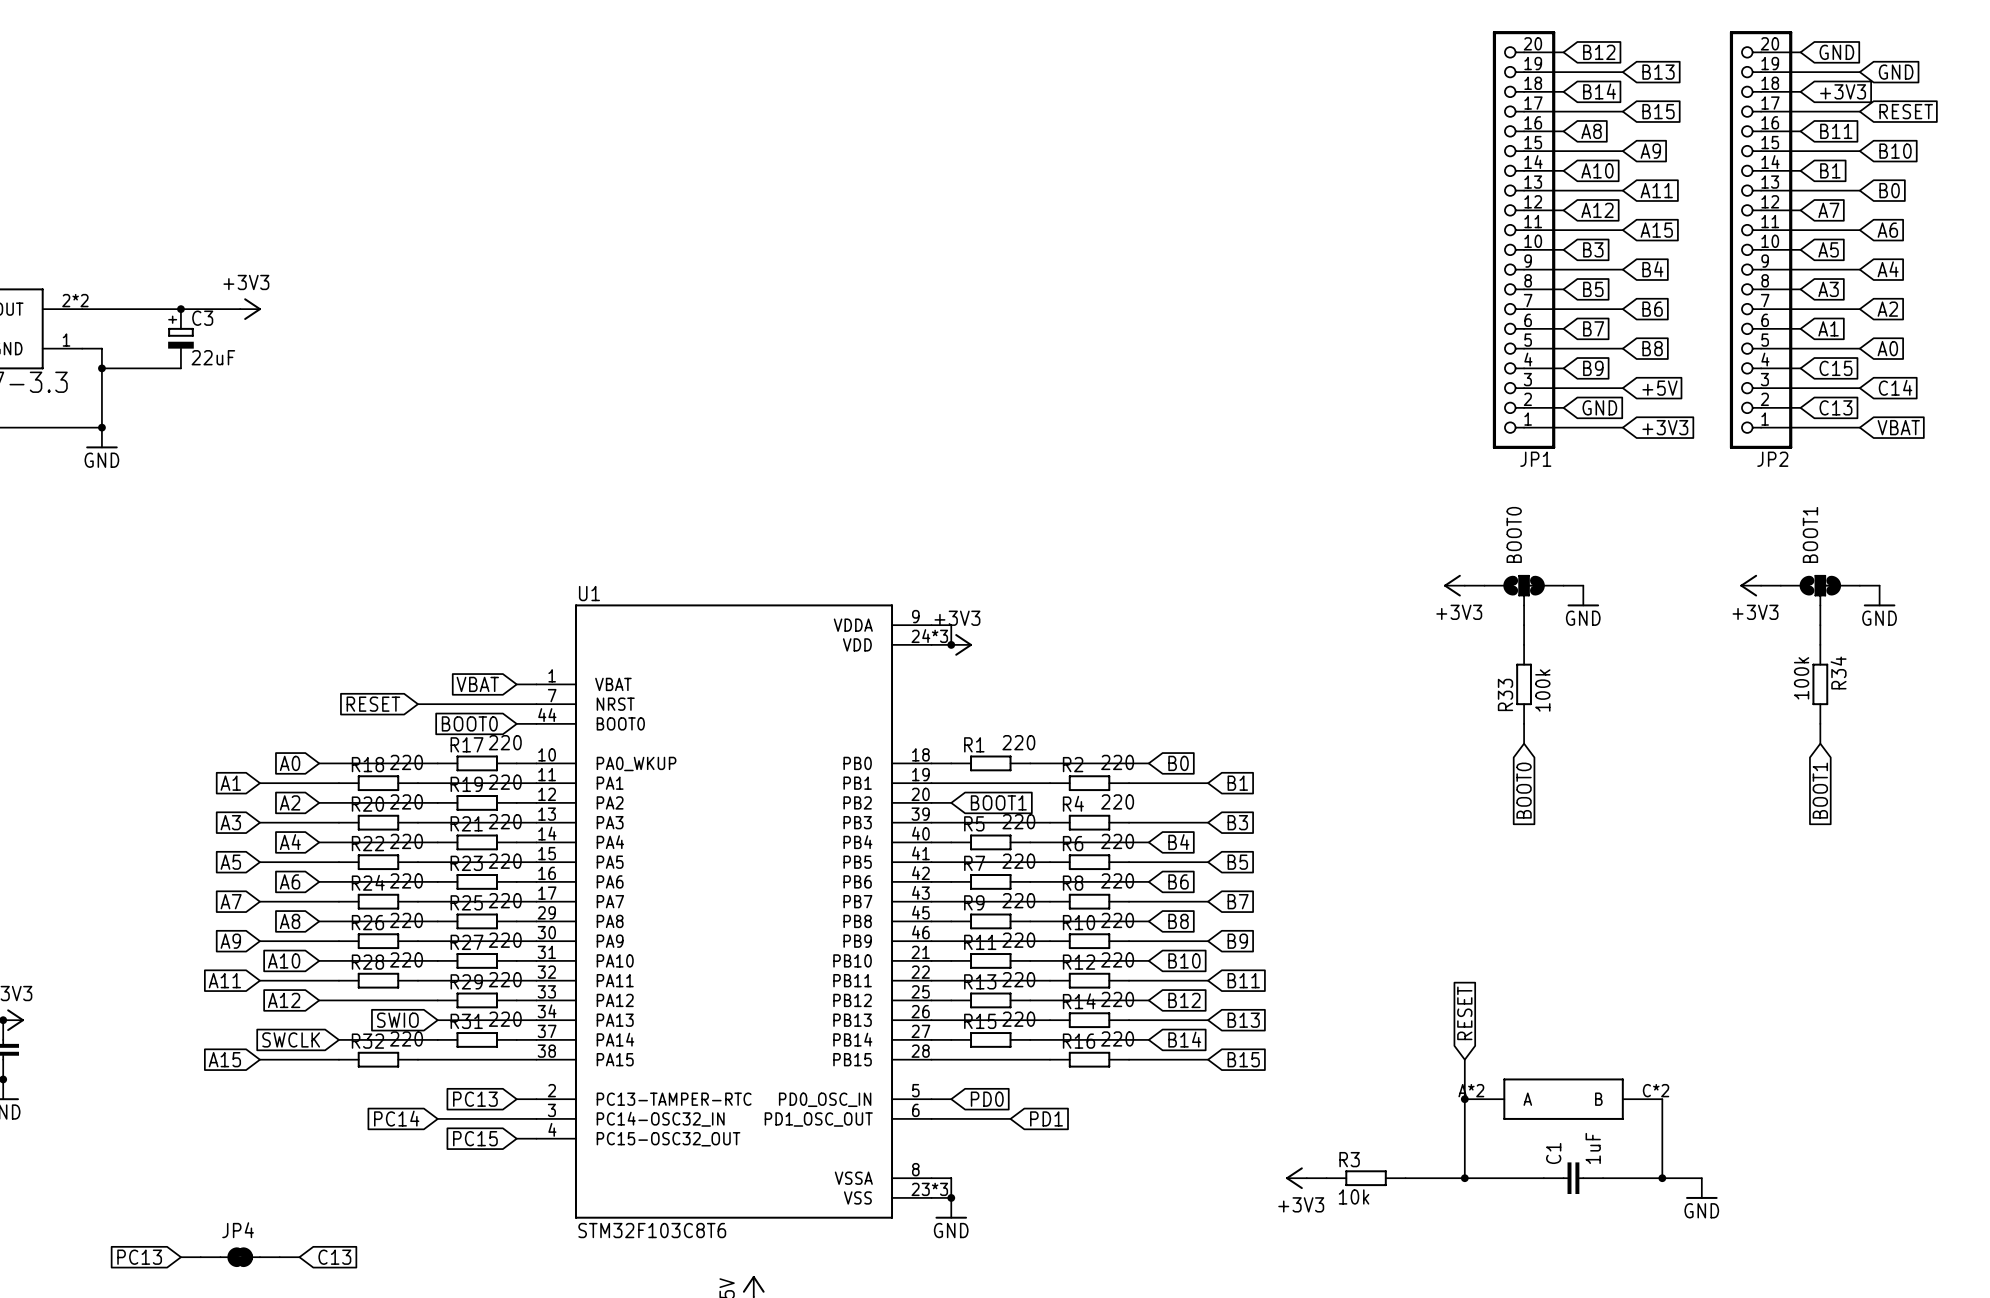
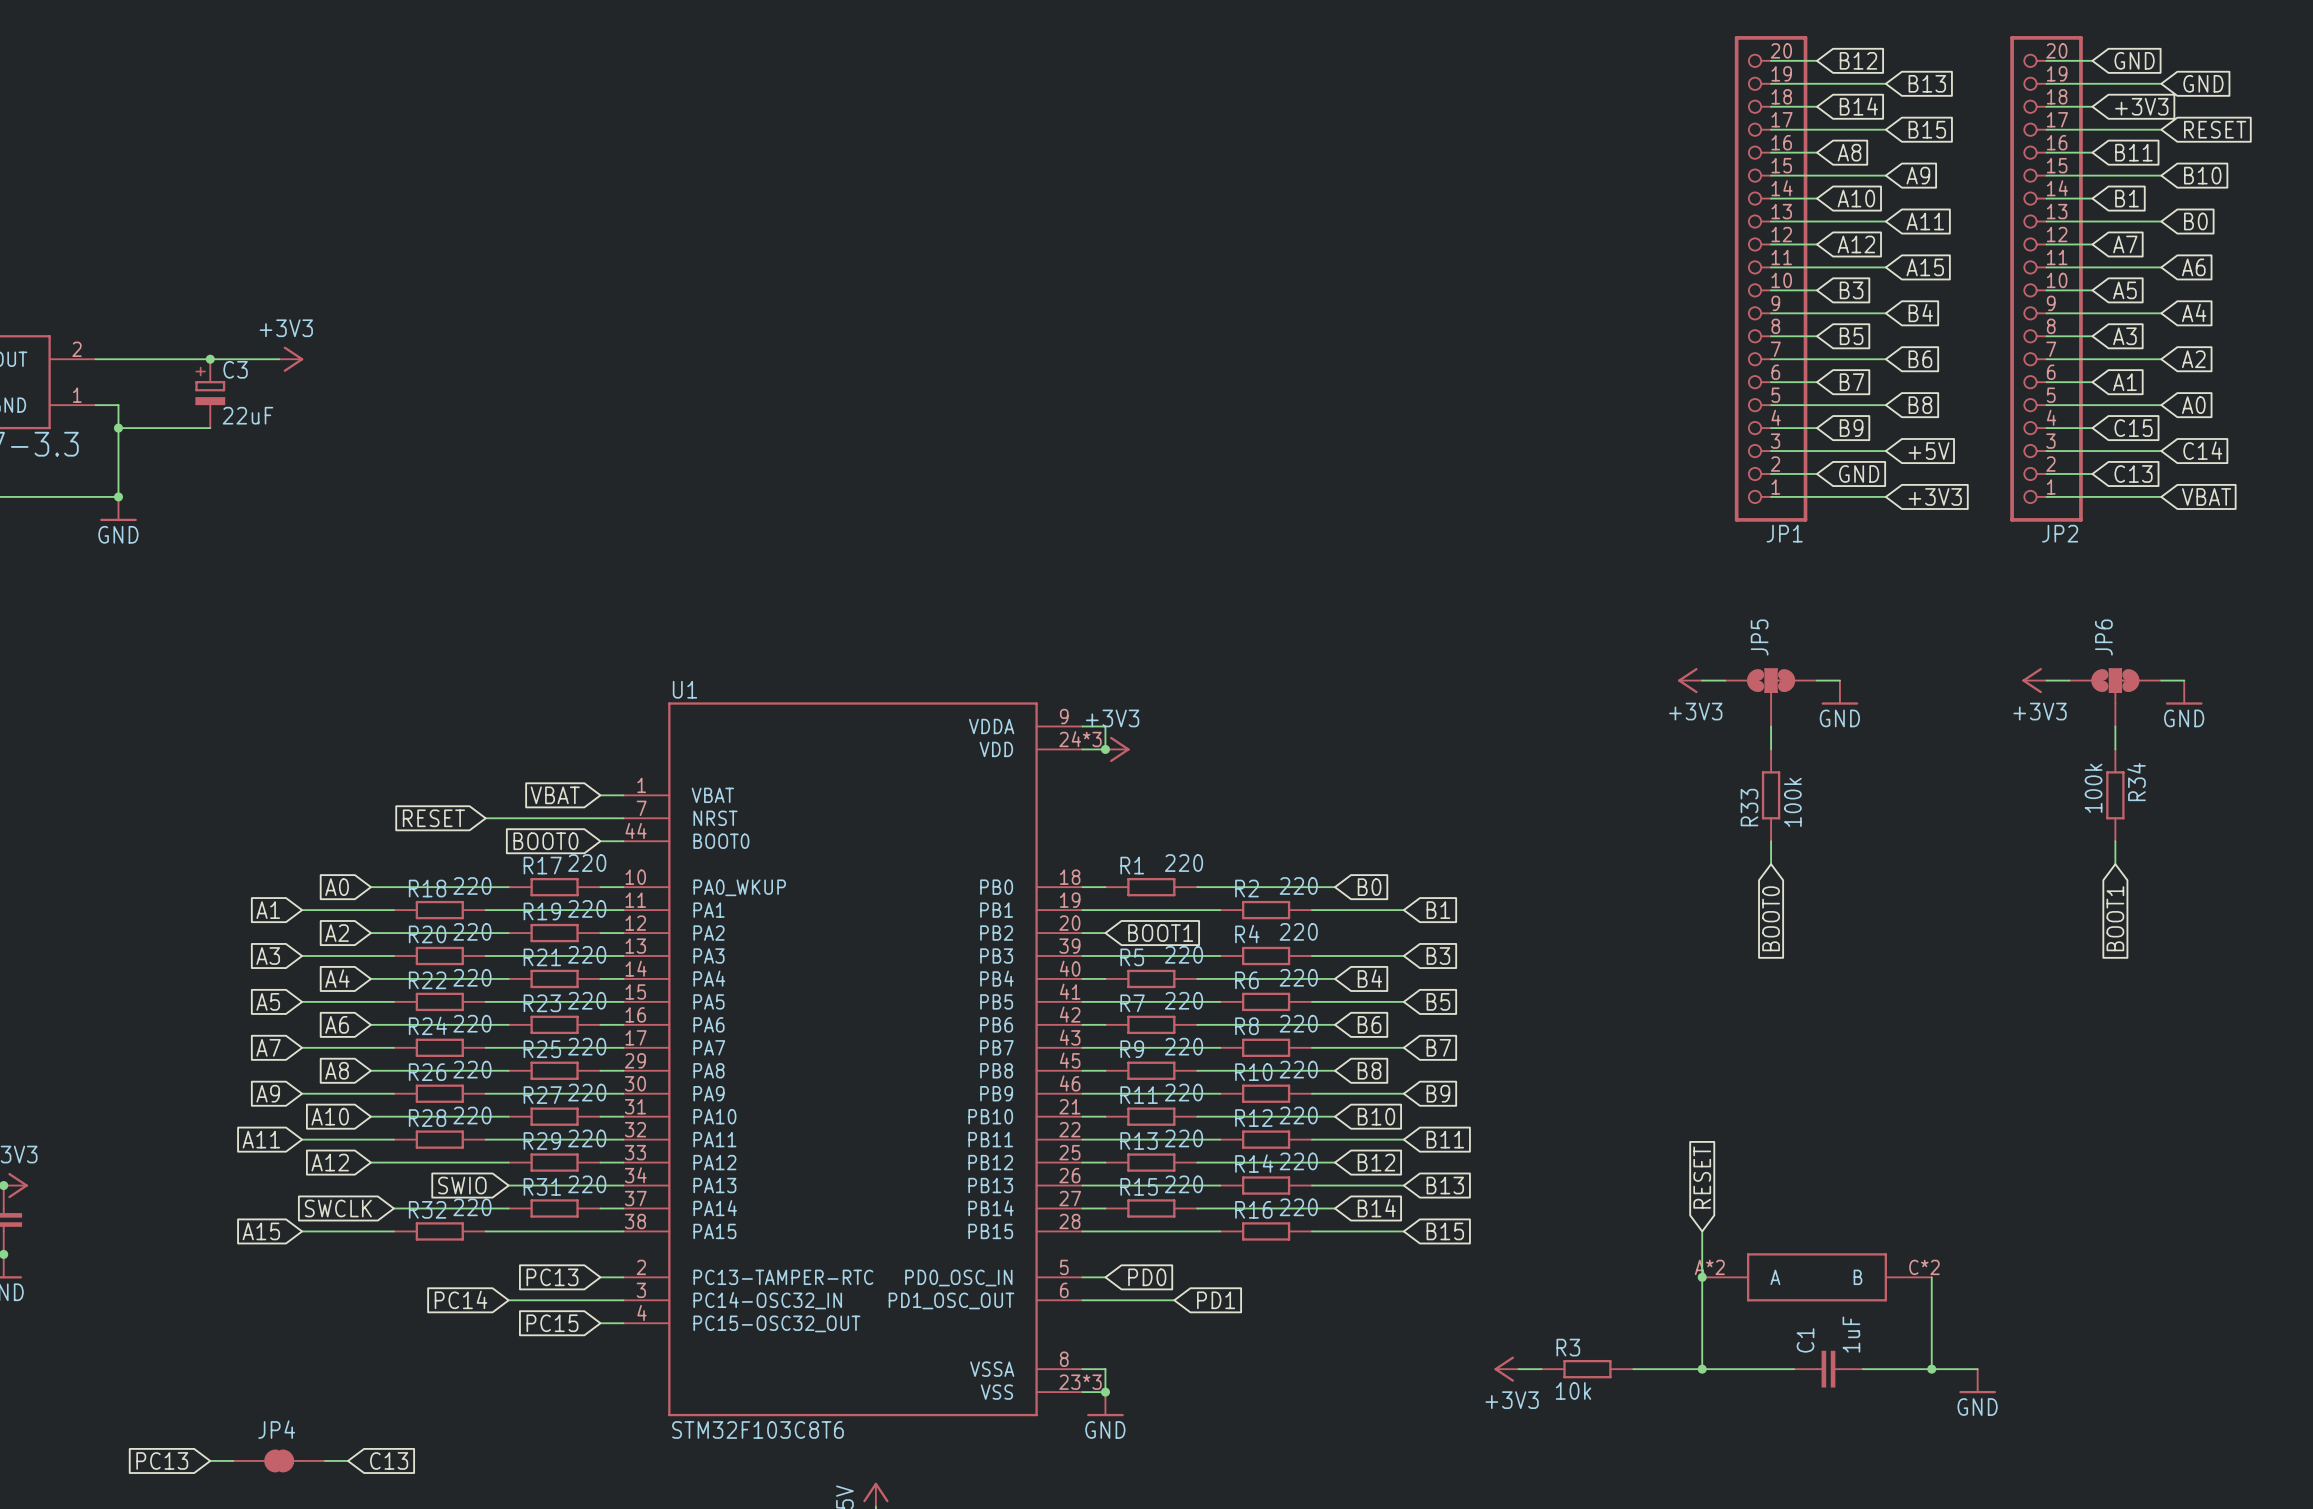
part pin number: 2*2 (75, 300) -> 2 (77, 349)
BOOT0 name: BOOT0 (1514, 534) -> JP5 (1759, 637)
BOOT1 name: BOOT1 (1810, 534) -> JP6 (2103, 637)

